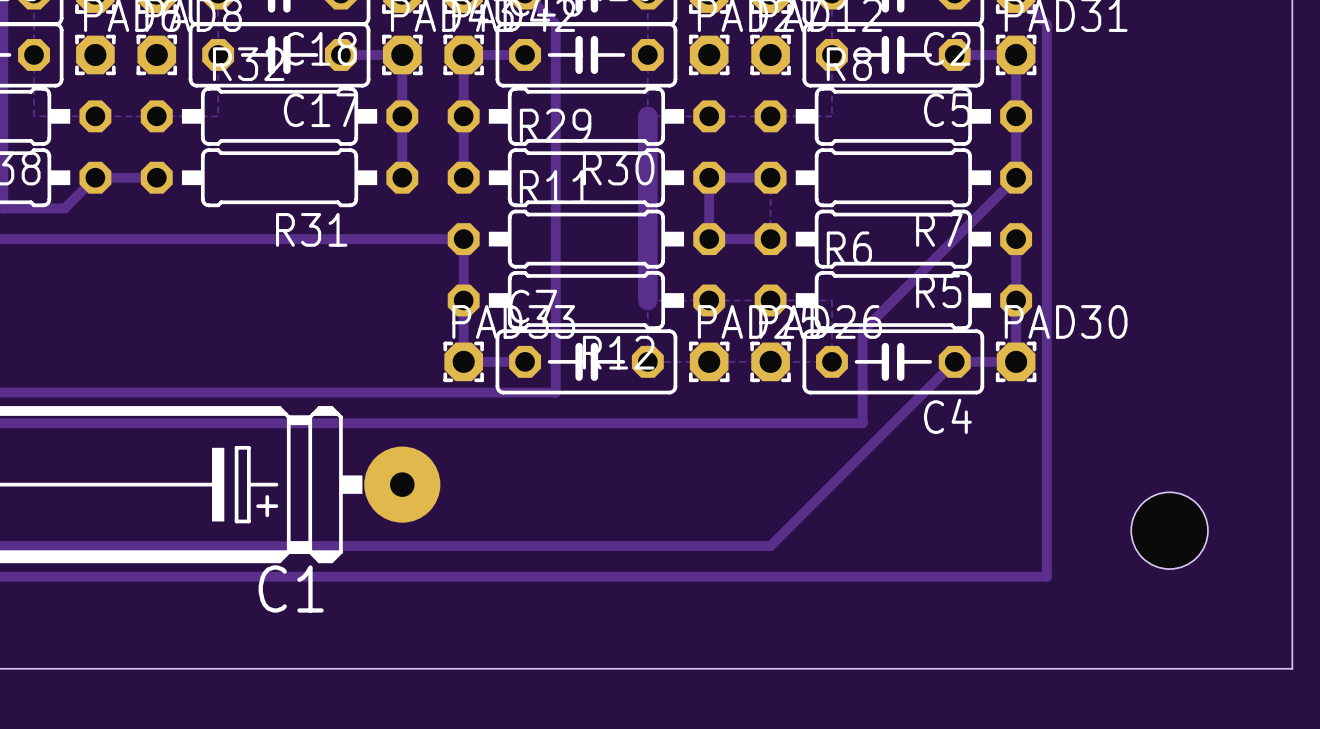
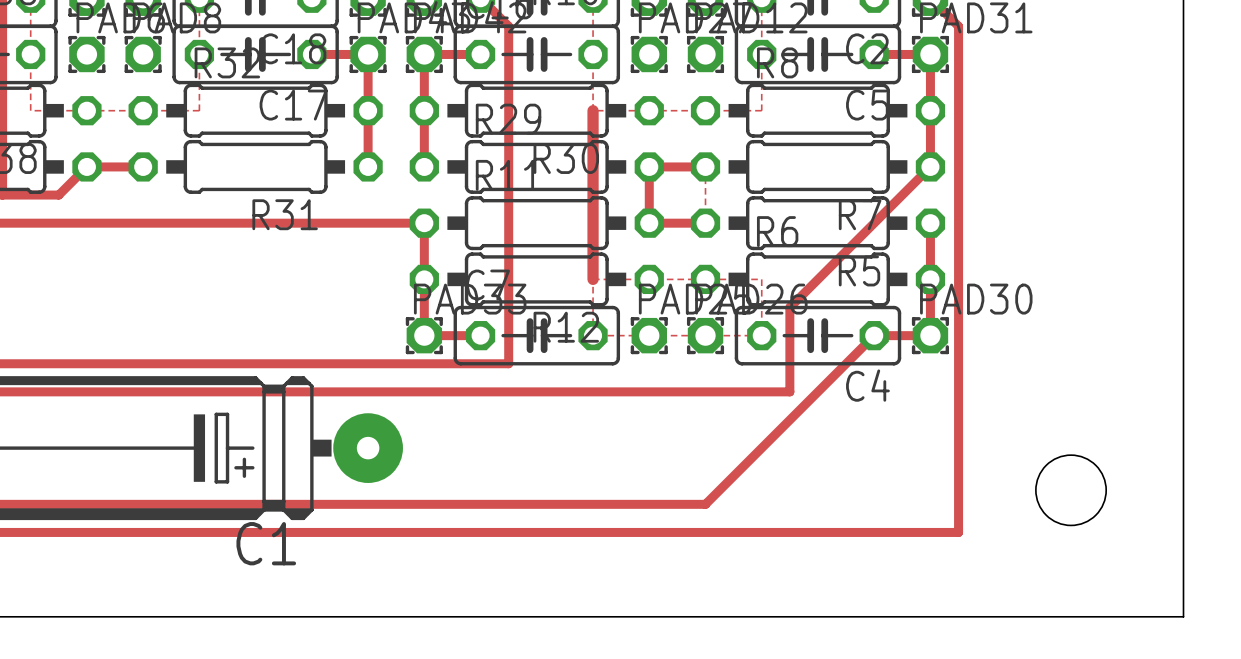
track width: thick (647, 116) (647, 300) -> thin (593, 110) (593, 279)

